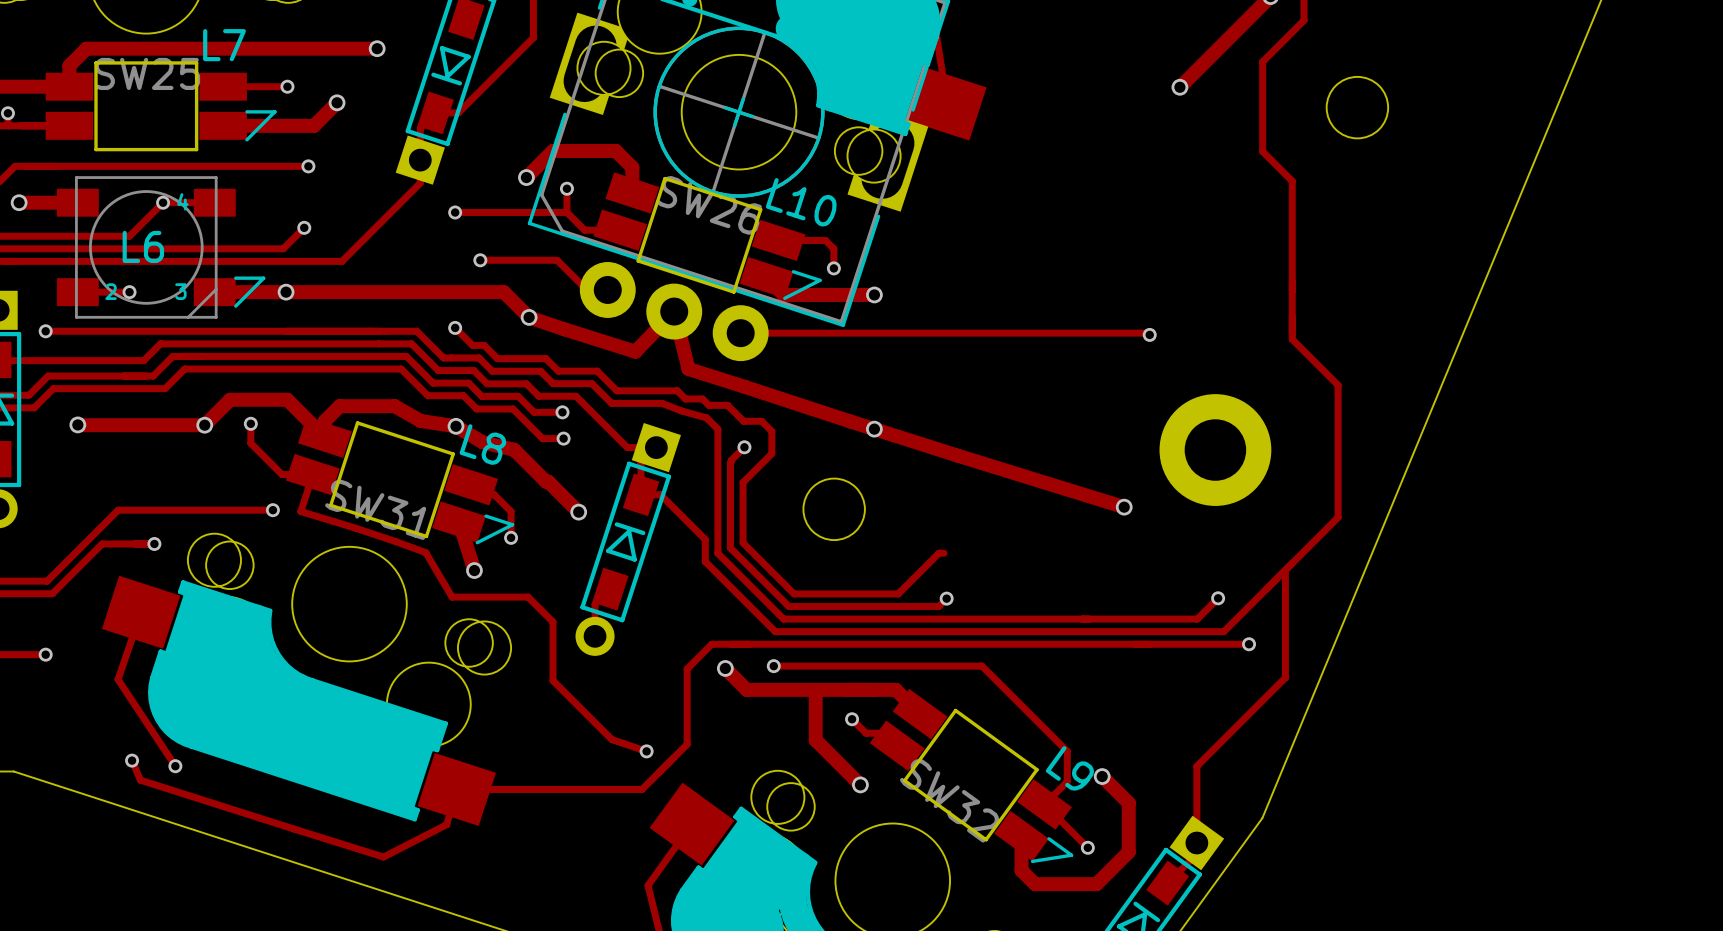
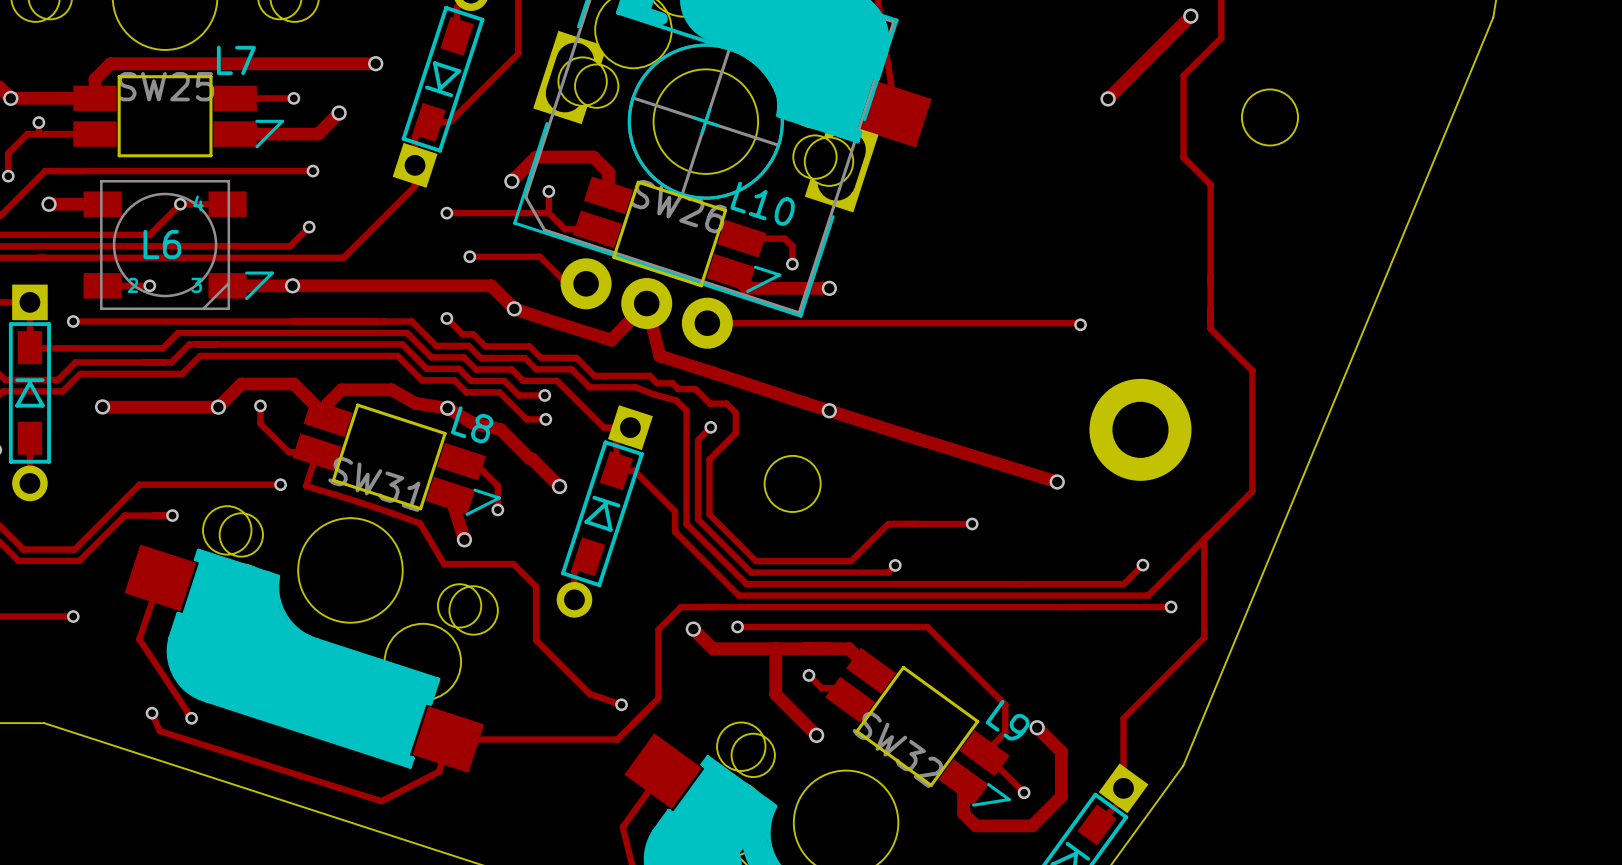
track: none -> (892, 523) (972, 523)
via: none -> (972, 523)

